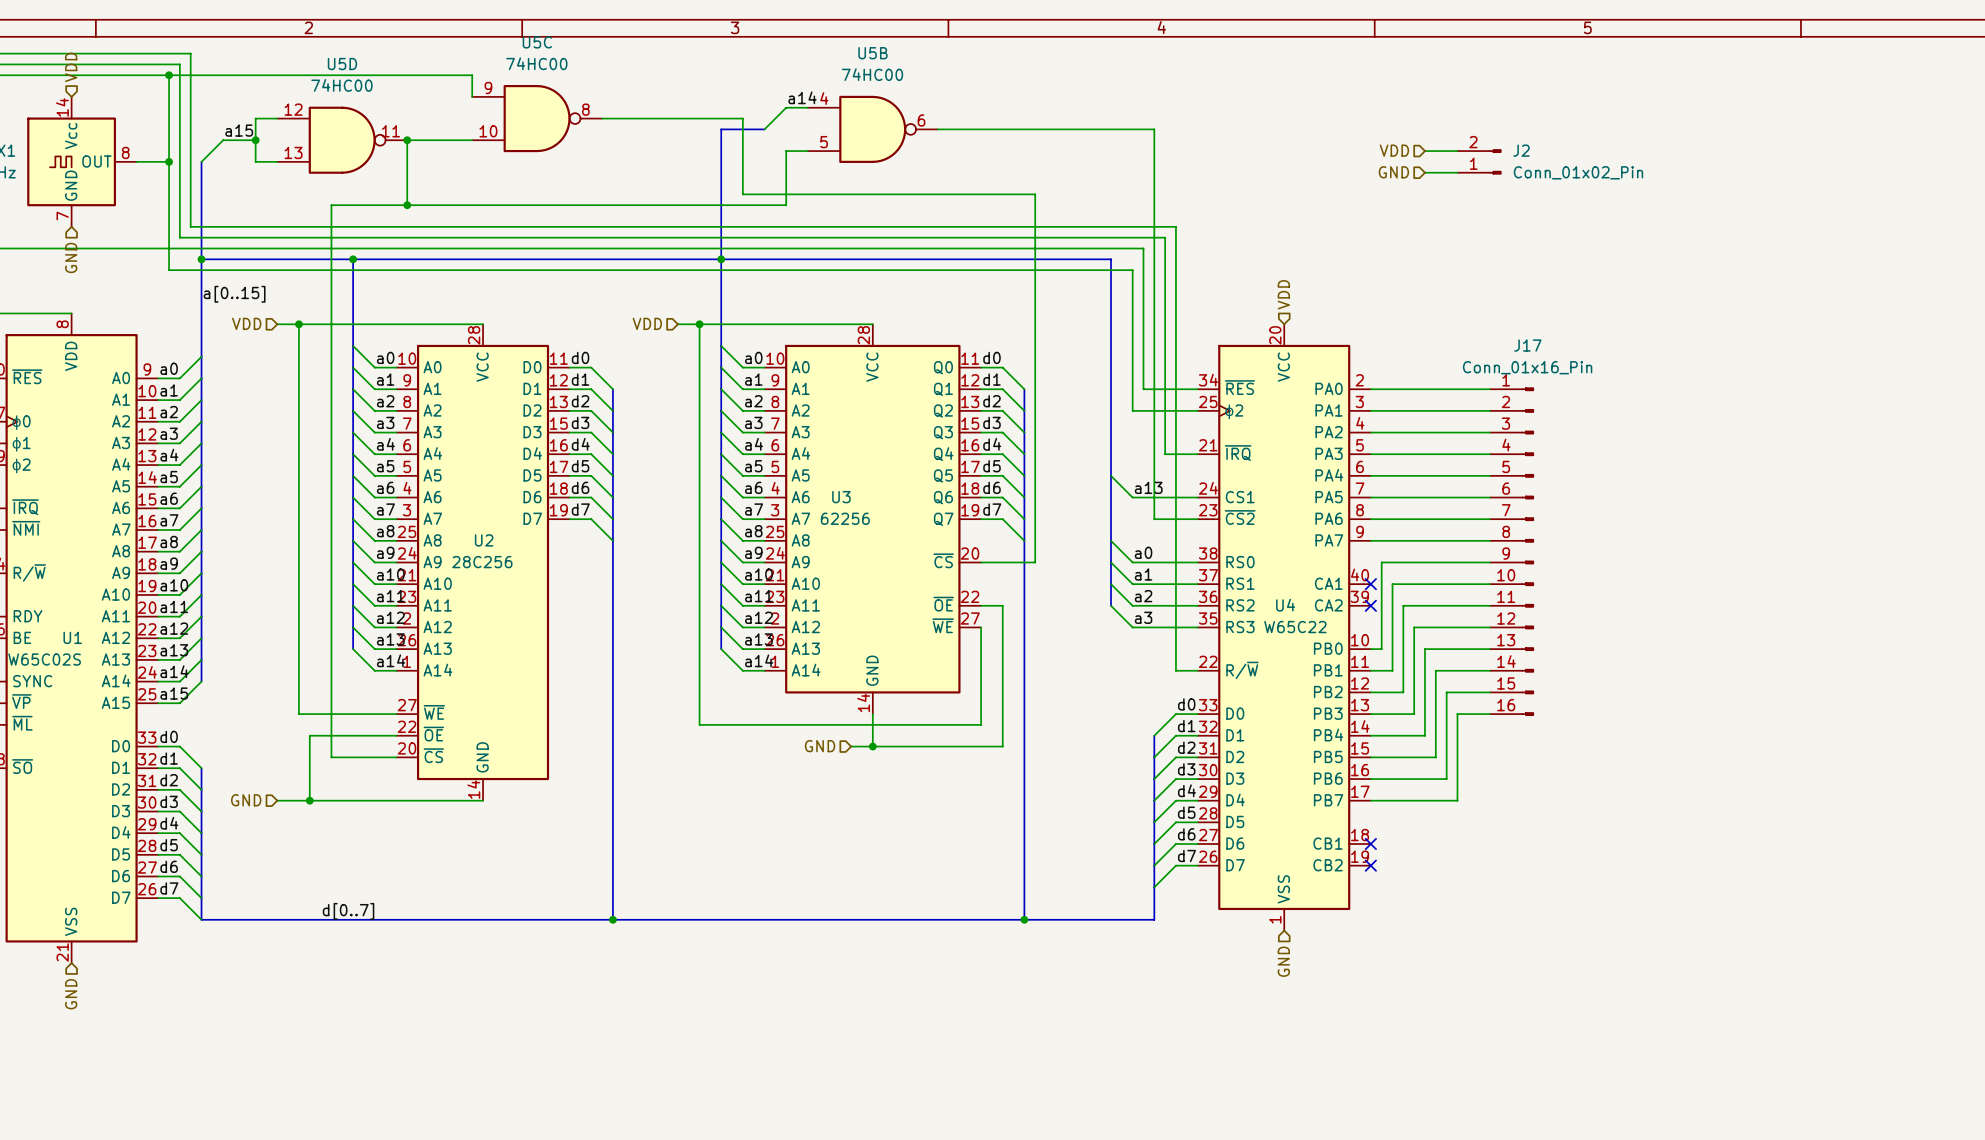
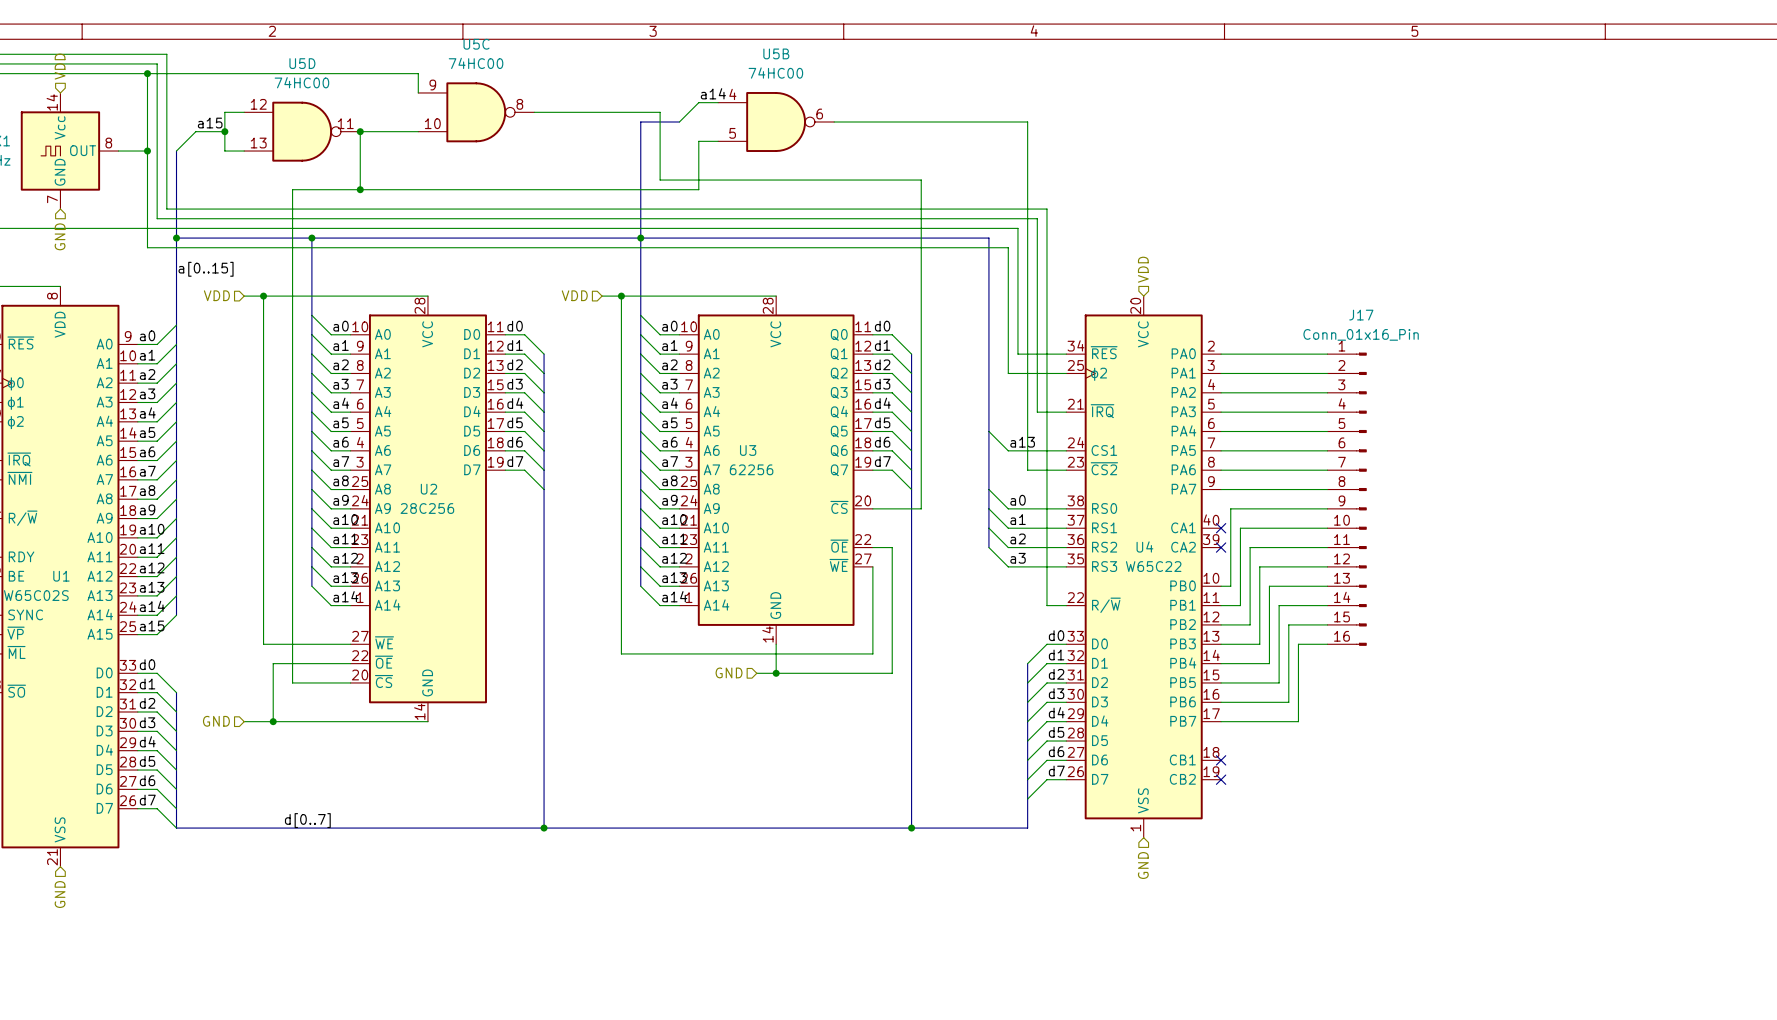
hierarchical label: VDD (1394, 150) -> none
wire: (1425, 151) (1457, 151) -> none
J2: Conn_01x02_Pin (1479, 161) -> none
hierarchical label: GND (1393, 172) -> none
wire: (1425, 172) (1457, 172) -> none

